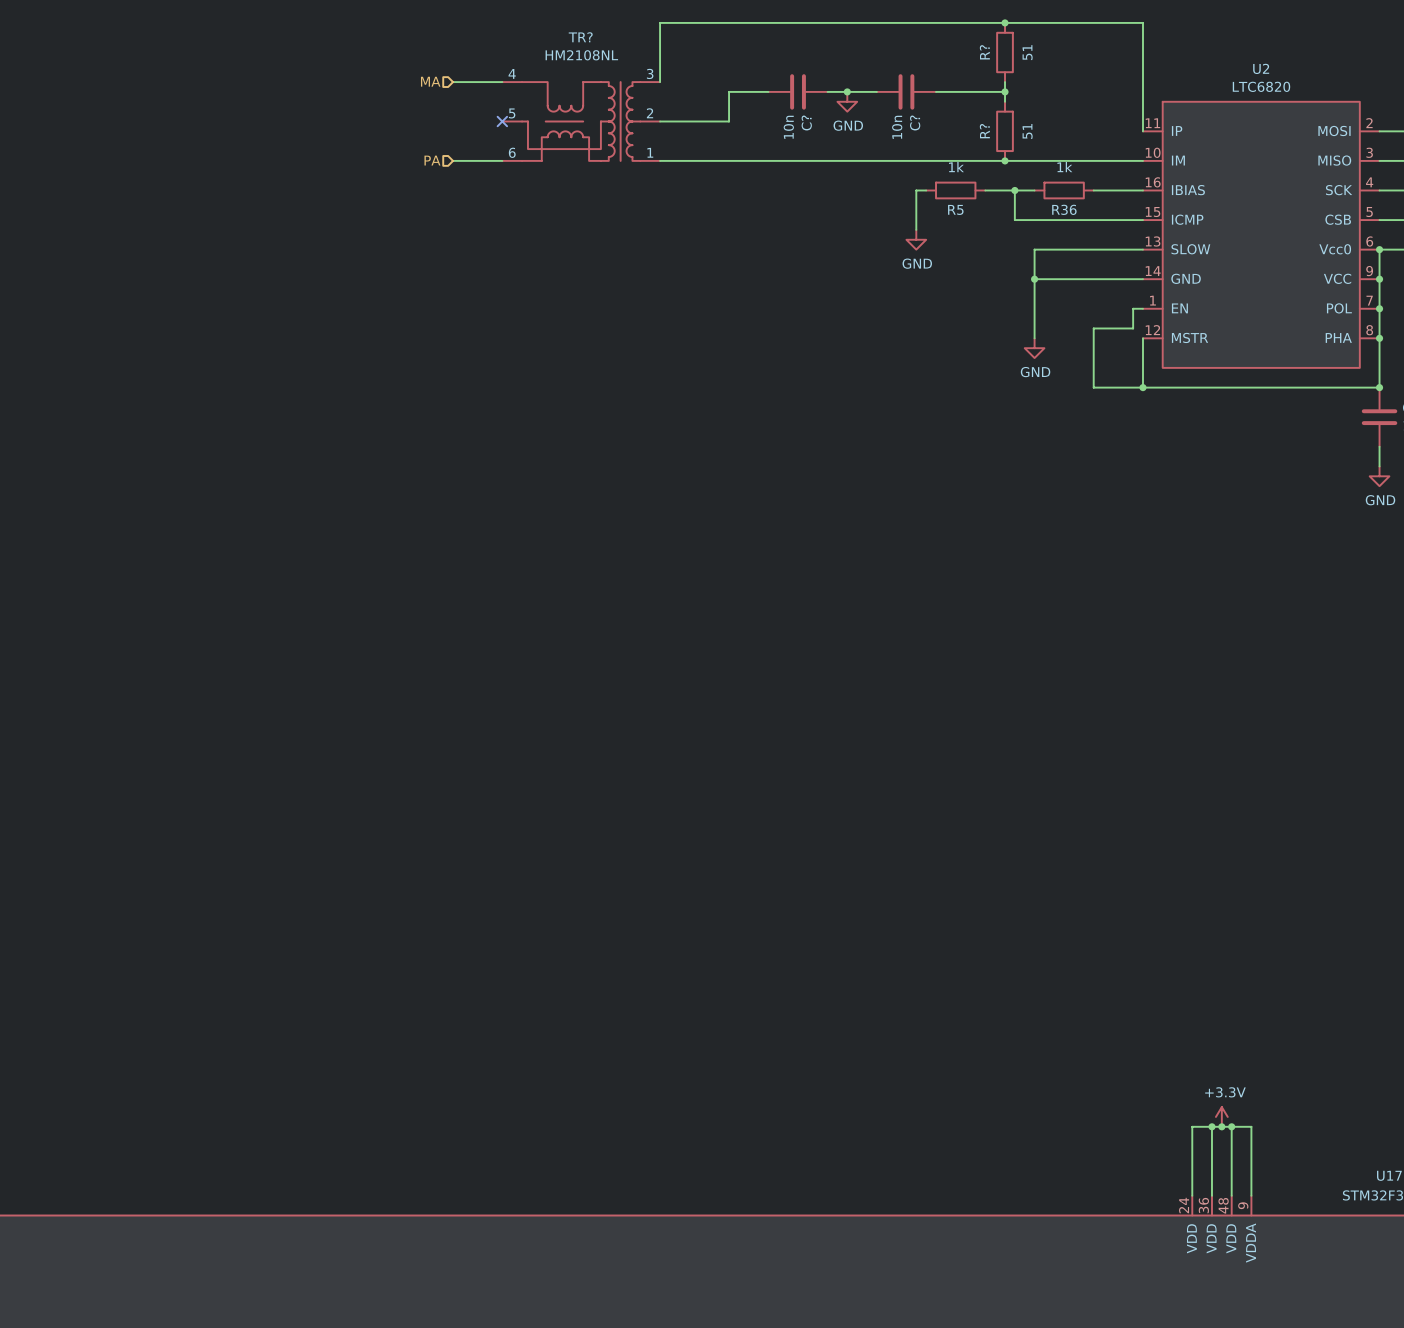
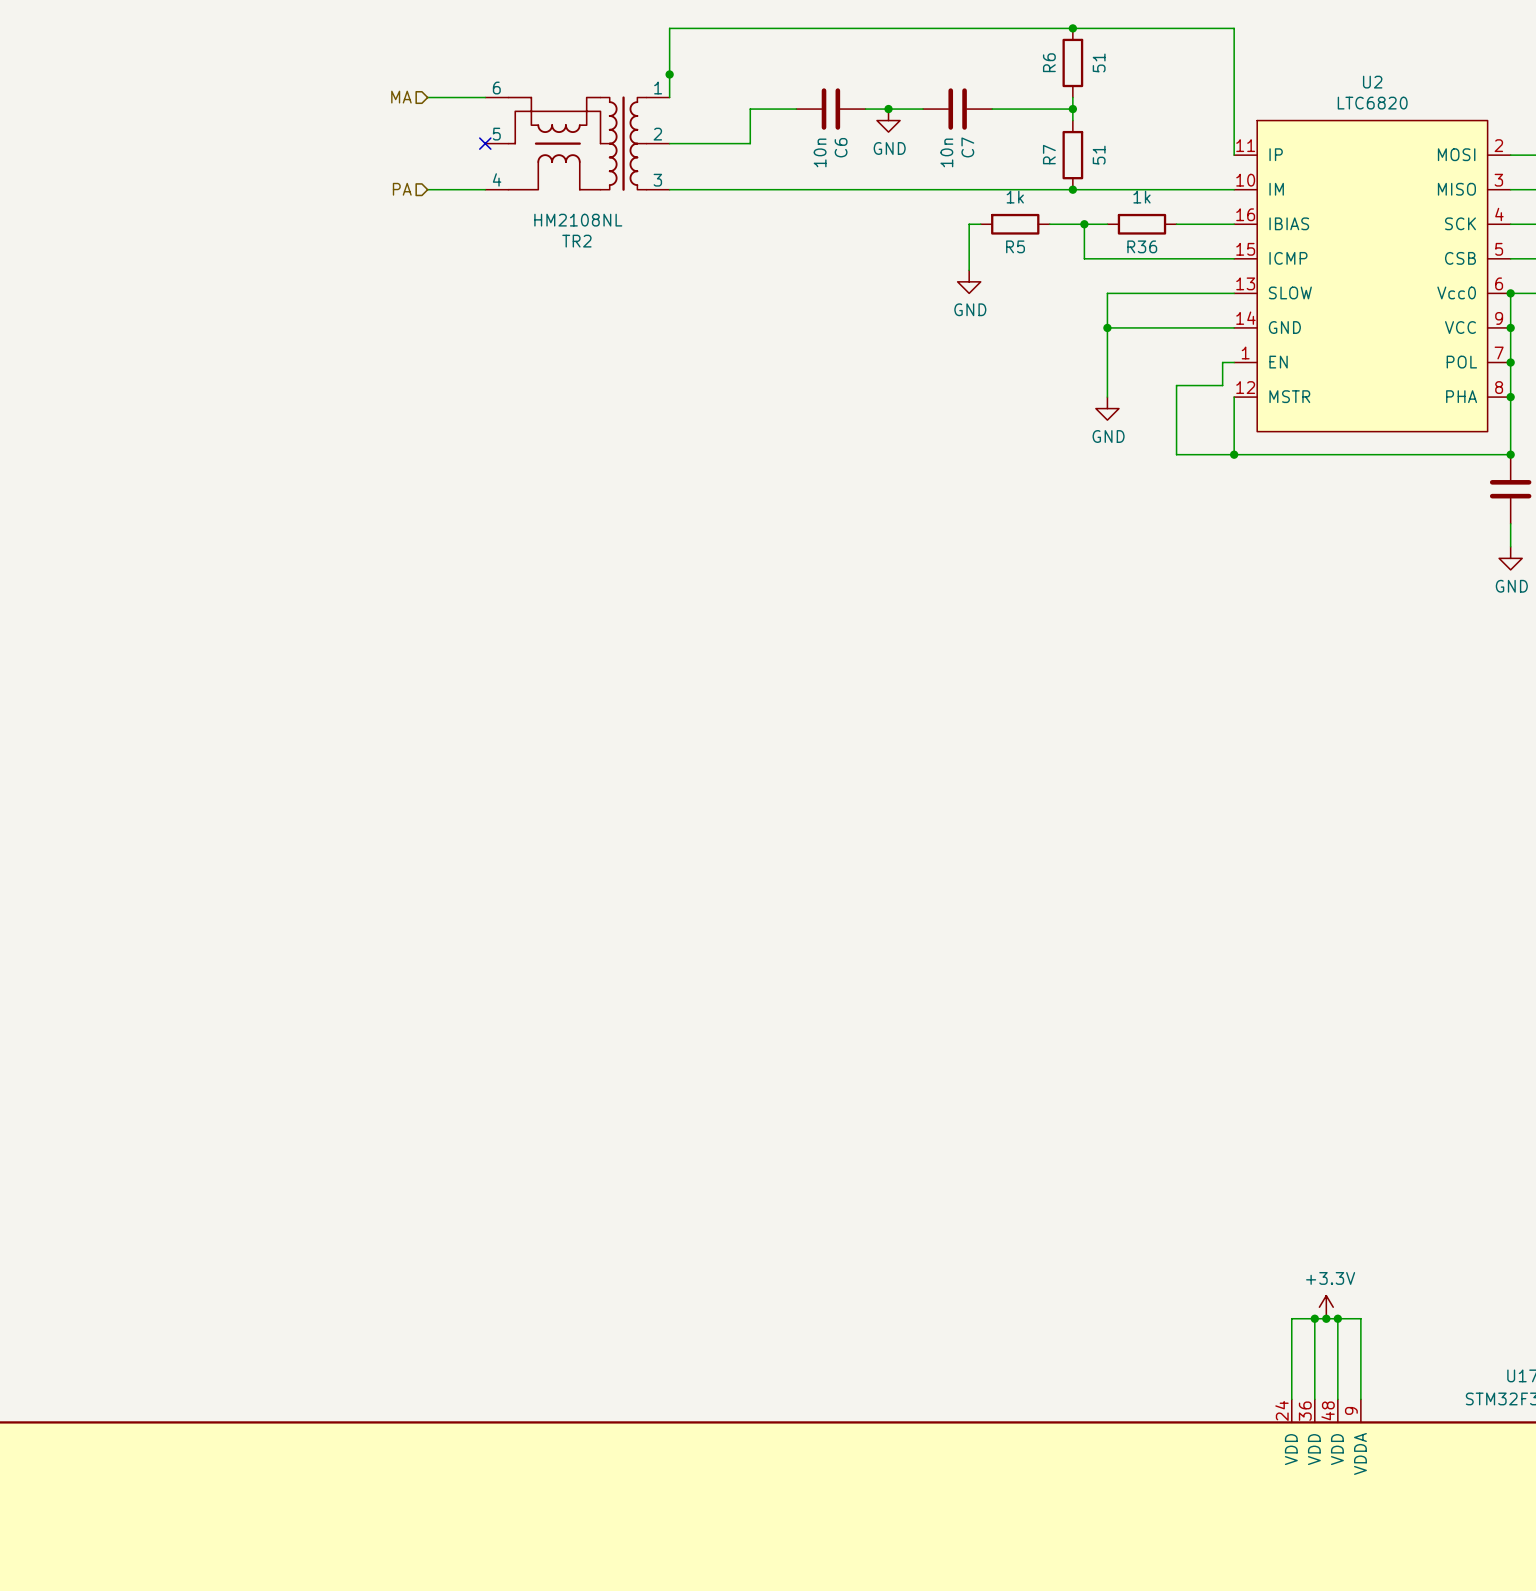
R? name: R? (984, 52) -> R6 (1049, 62)
junction: none -> (669, 74)
TR?: HM2108NL (581, 121) -> none
TR2: none -> HM2108NL (577, 143)
C? name: C? (806, 123) -> C6 (841, 147)
C? name: C? (915, 123) -> C7 (967, 147)
R? name: R? (984, 131) -> R7 (1049, 154)

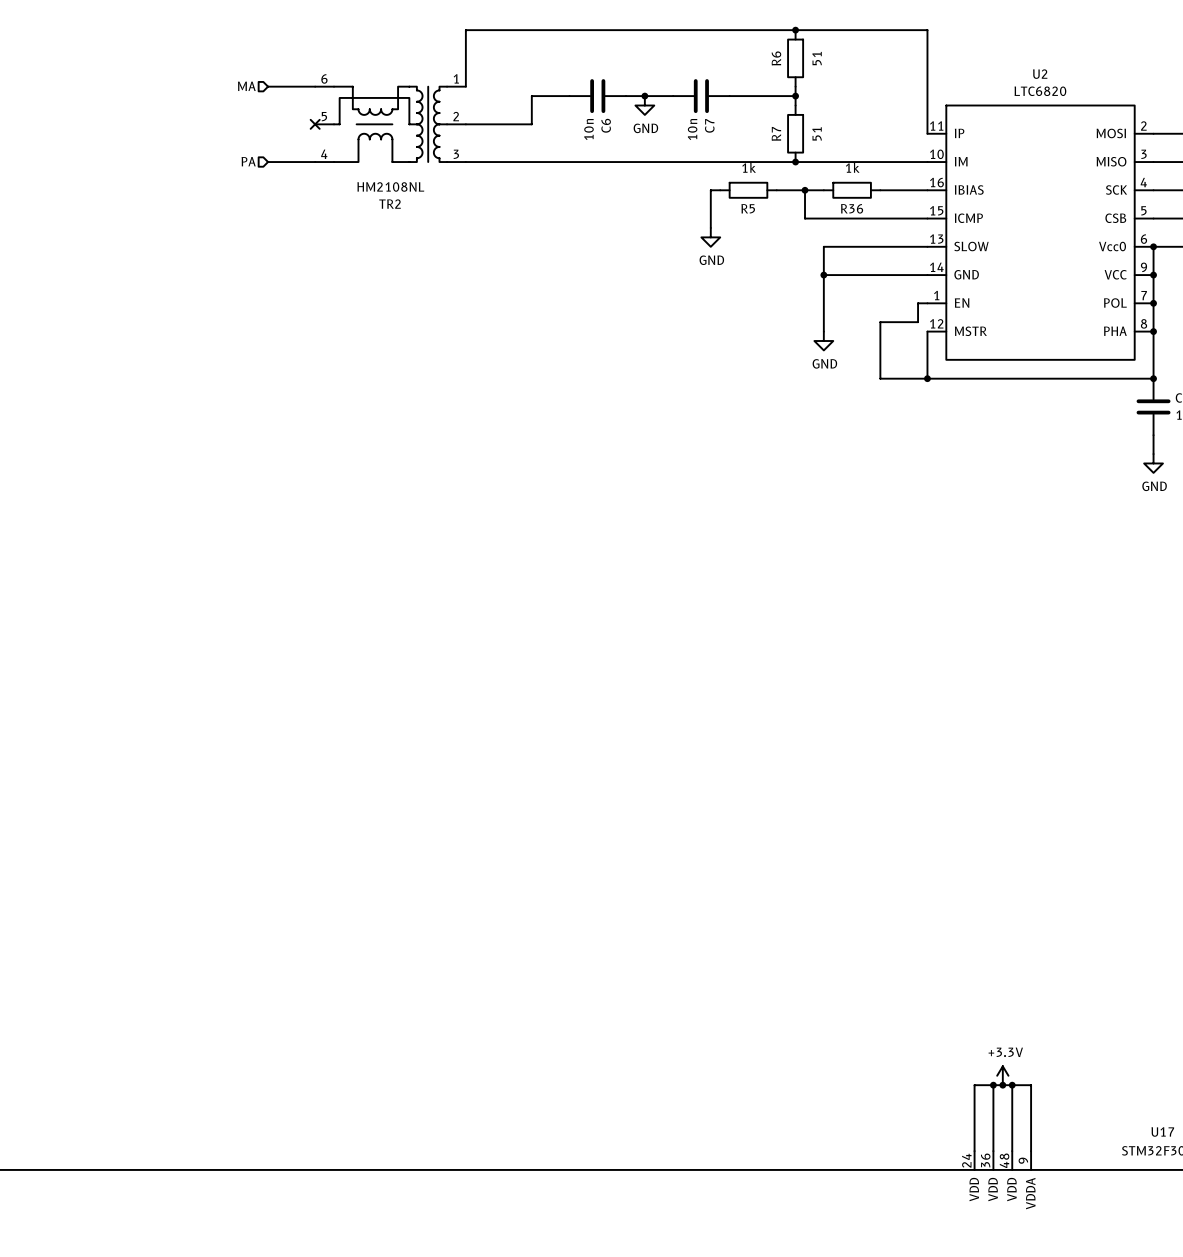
junction: (669, 74) -> none

